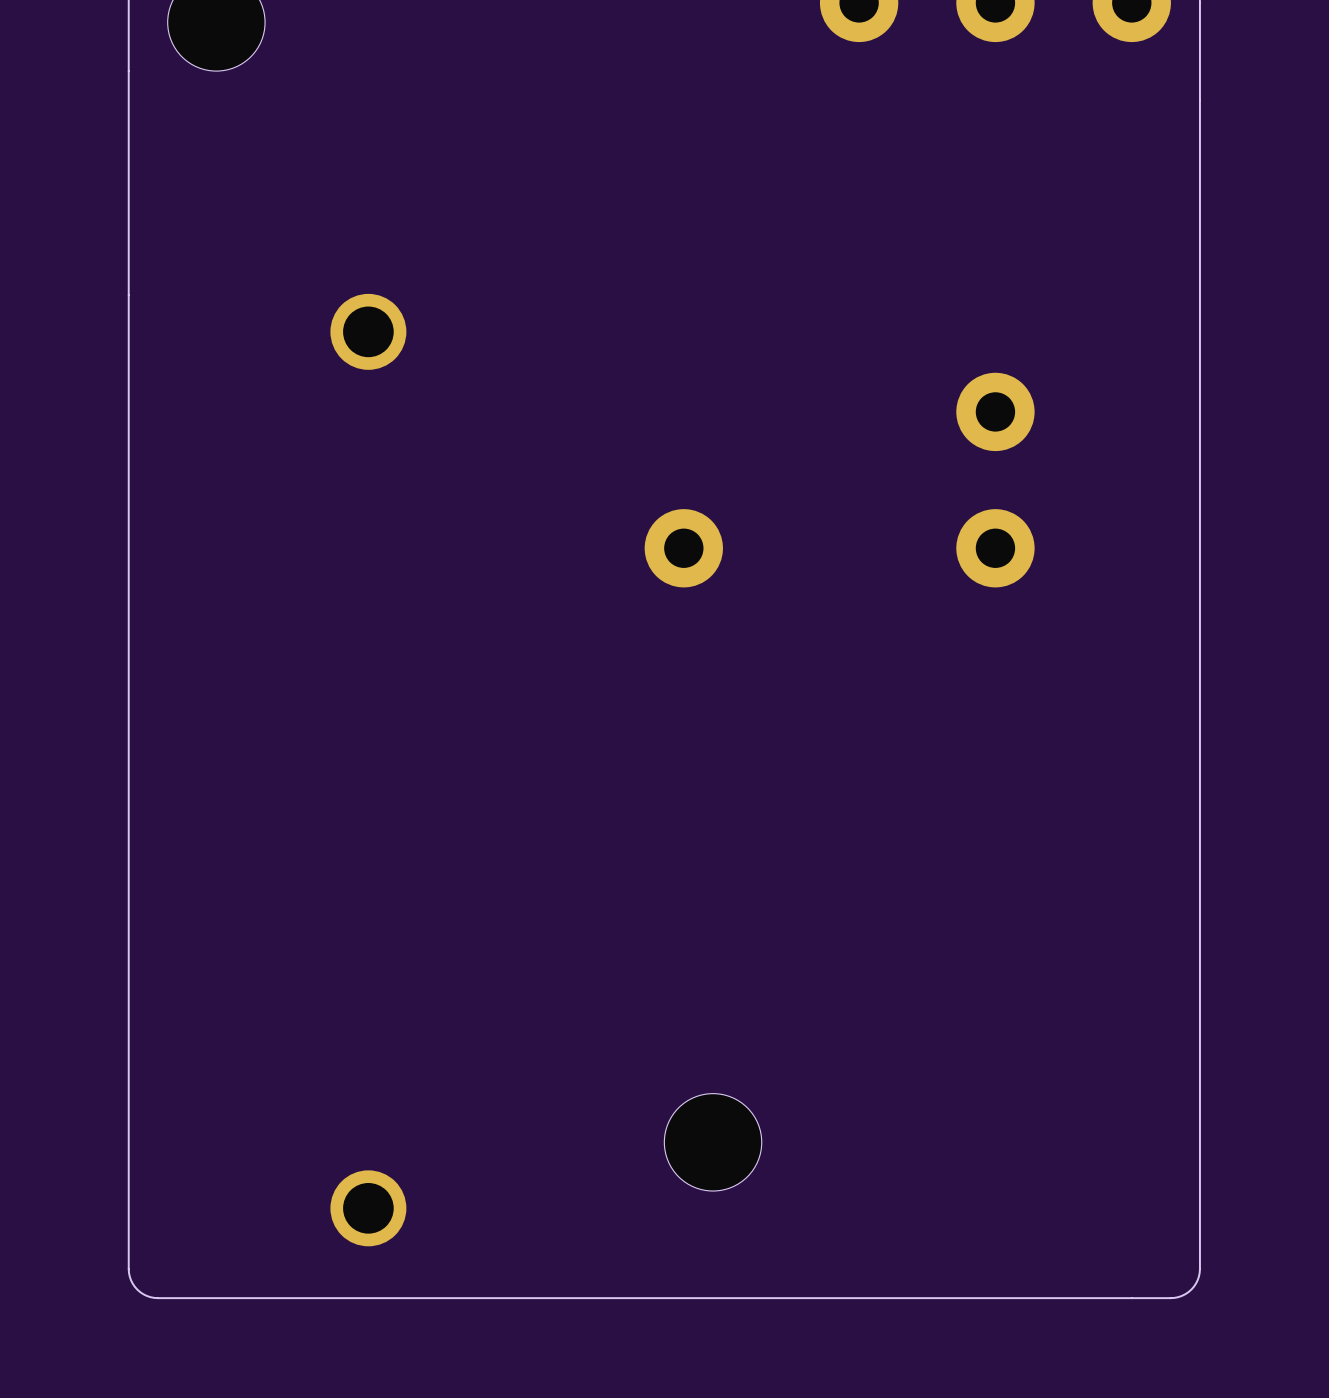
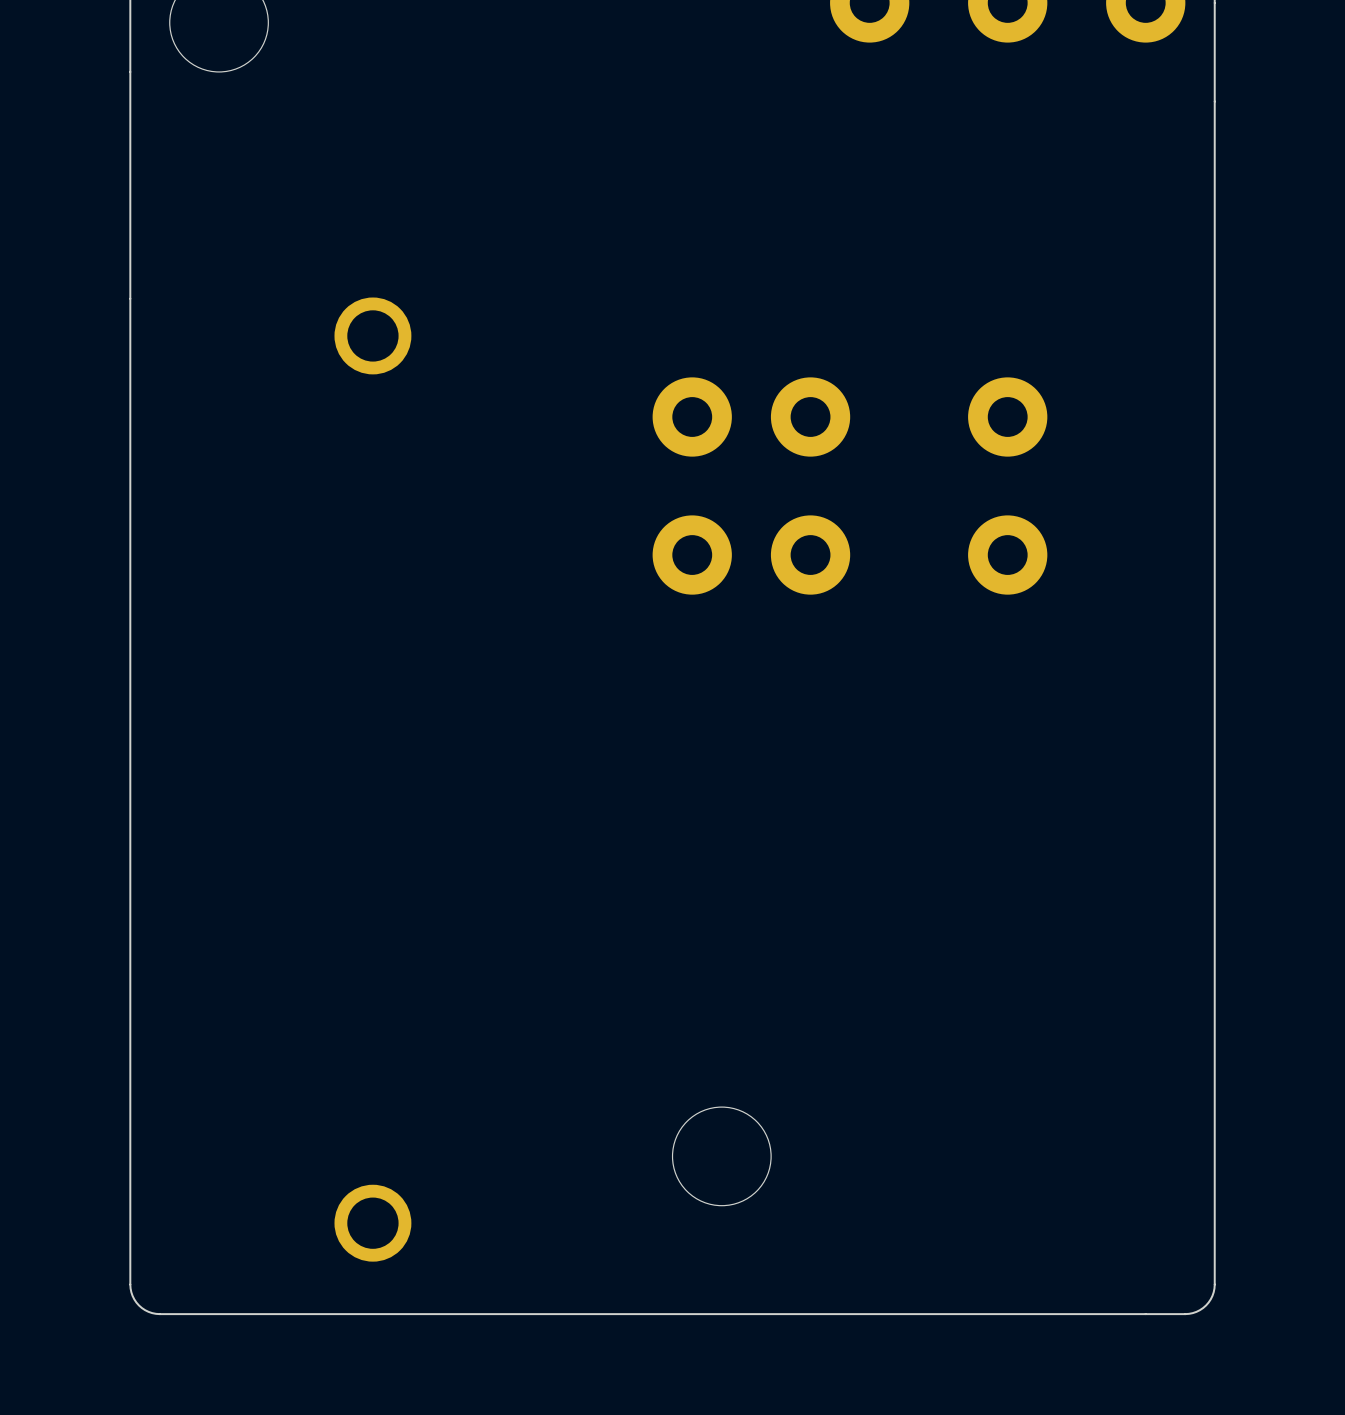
part: none -> (692, 417)
part: none -> (810, 417)
part: none -> (810, 555)

